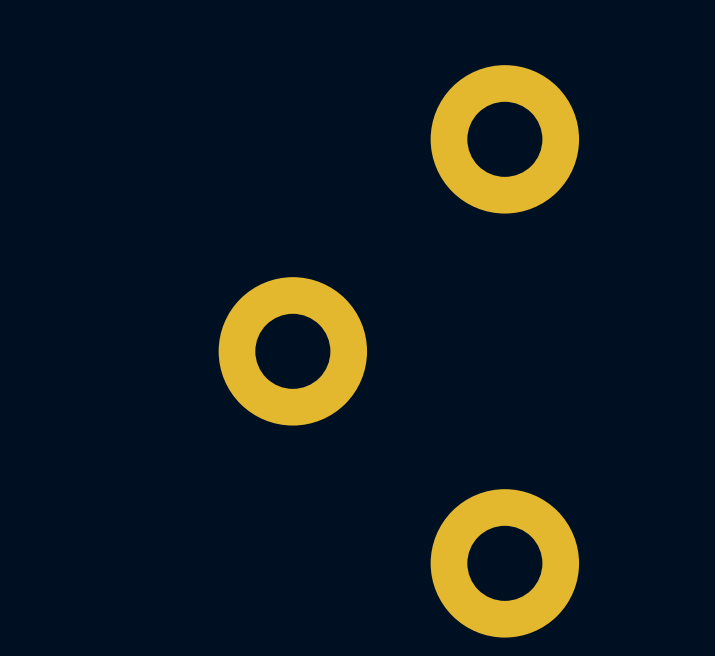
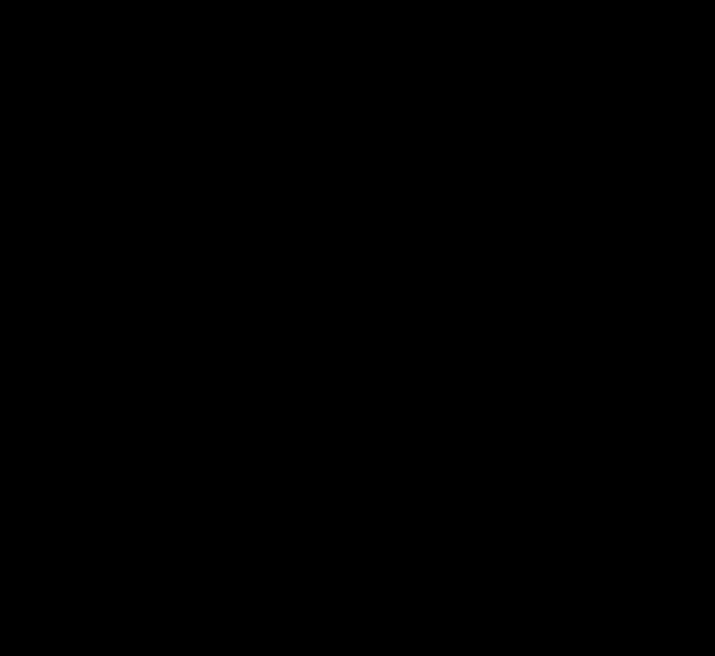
part: (398, 351) -> none

